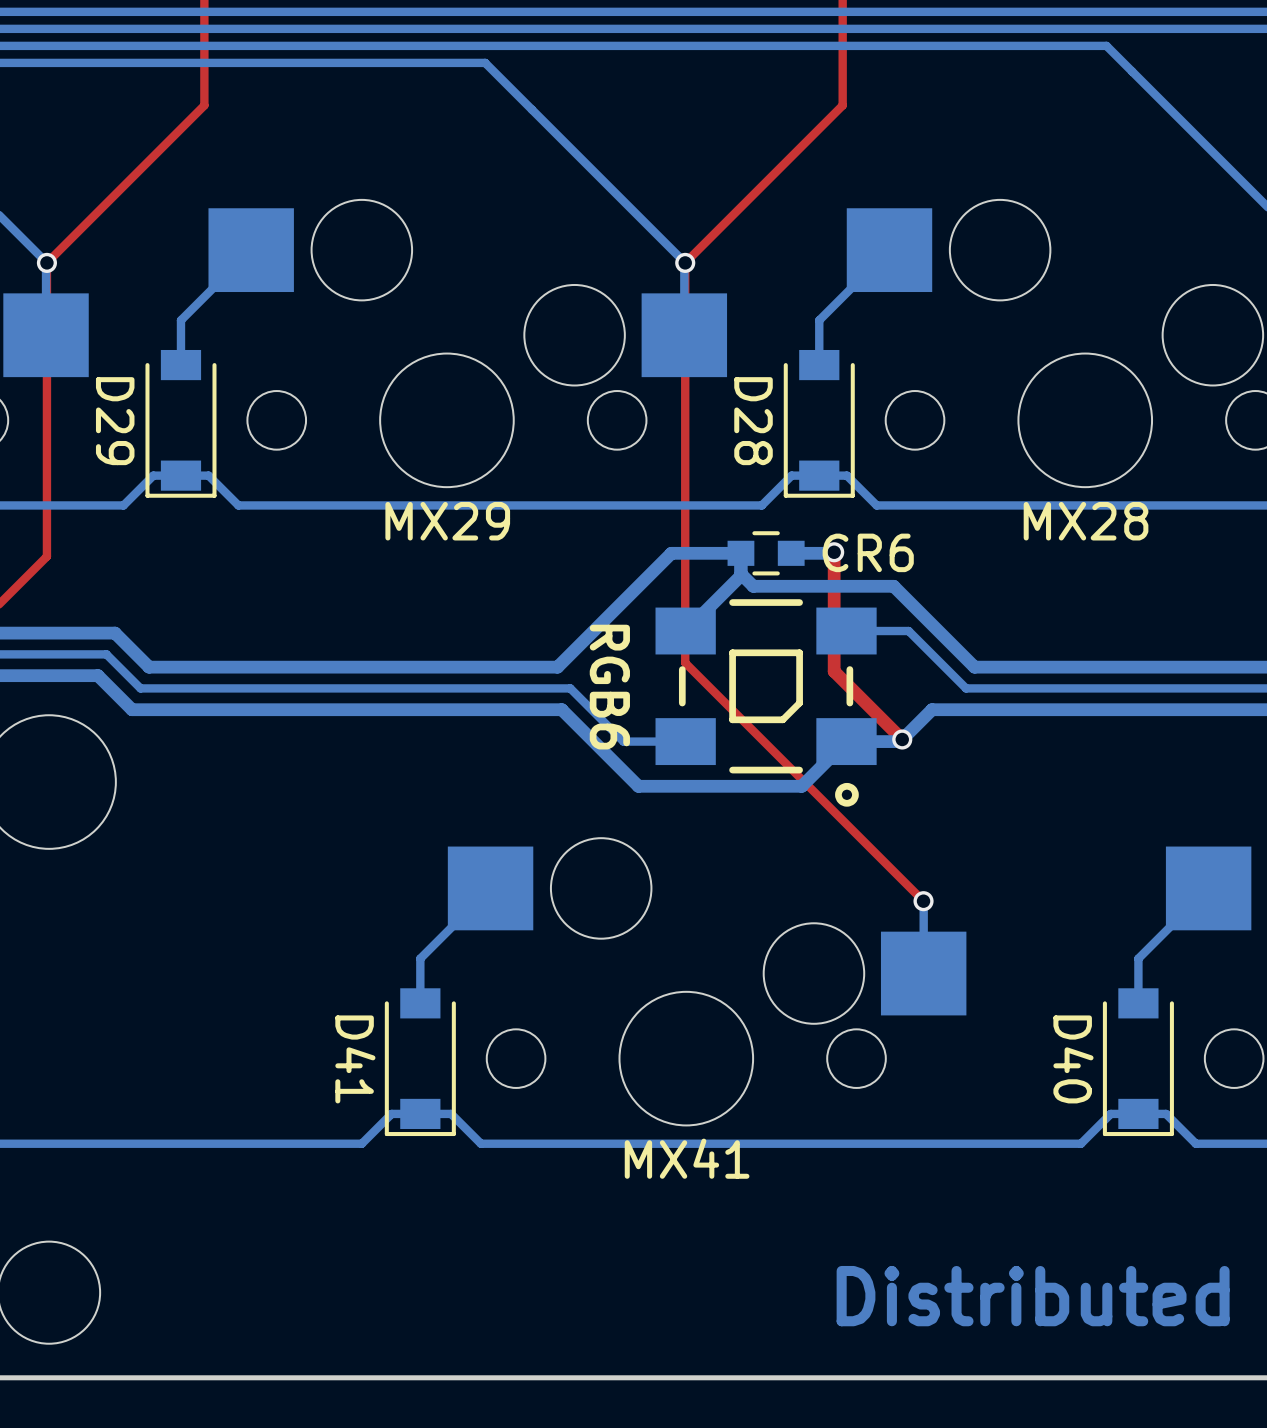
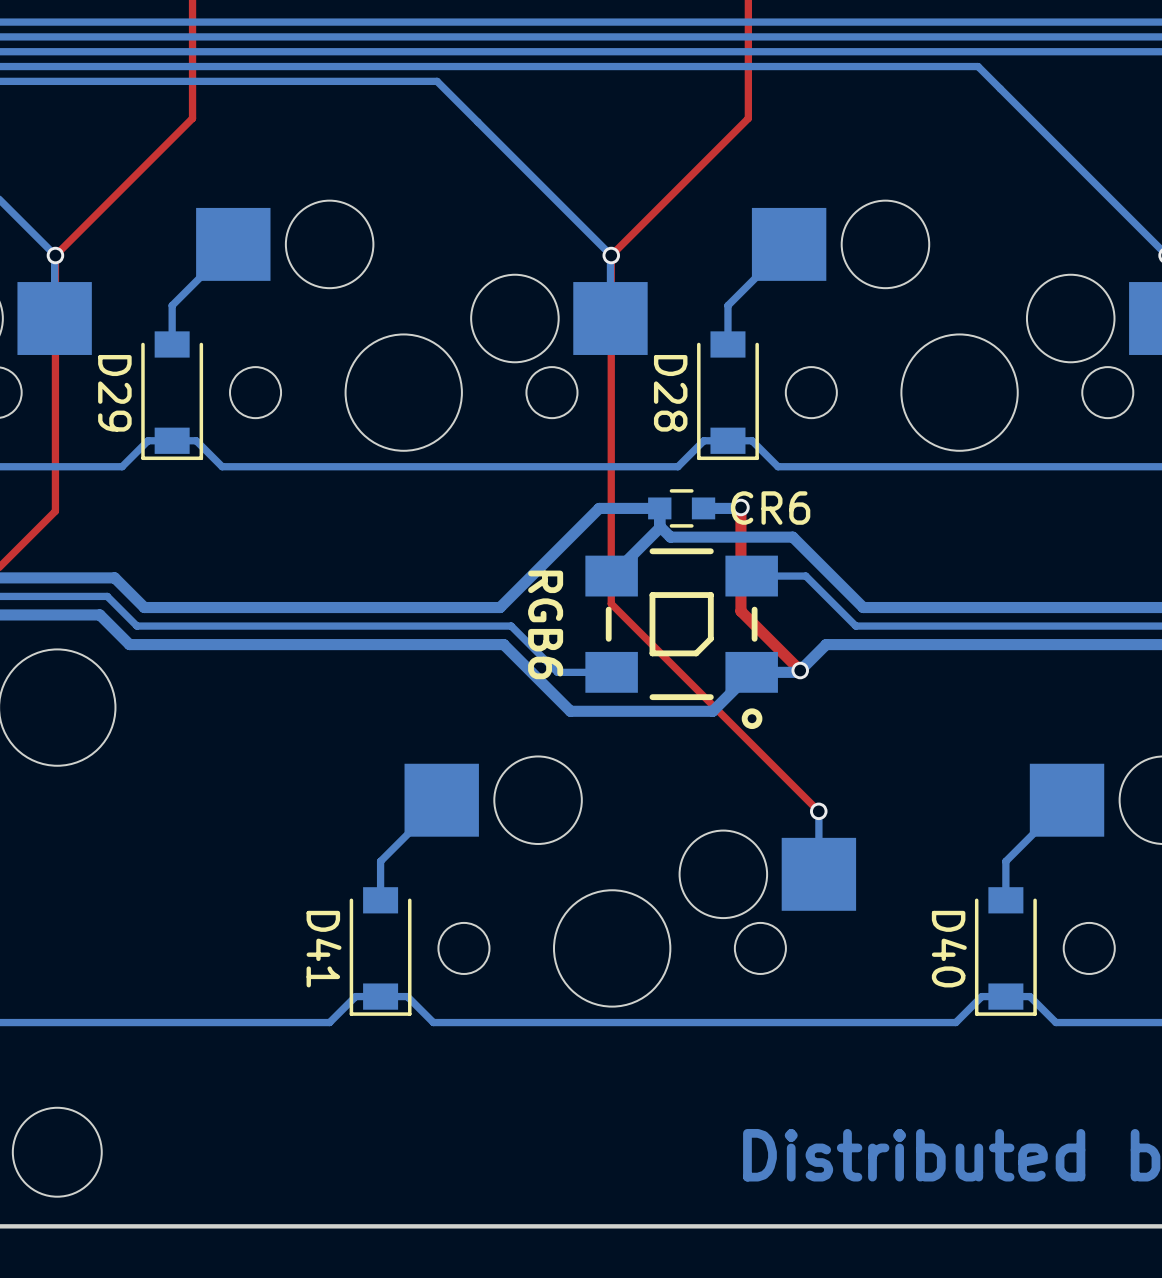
MX29 name: MX29 (447, 521) -> none
MX28 name: MX28 (1086, 521) -> none
MX41 name: MX41 (687, 1158) -> none

